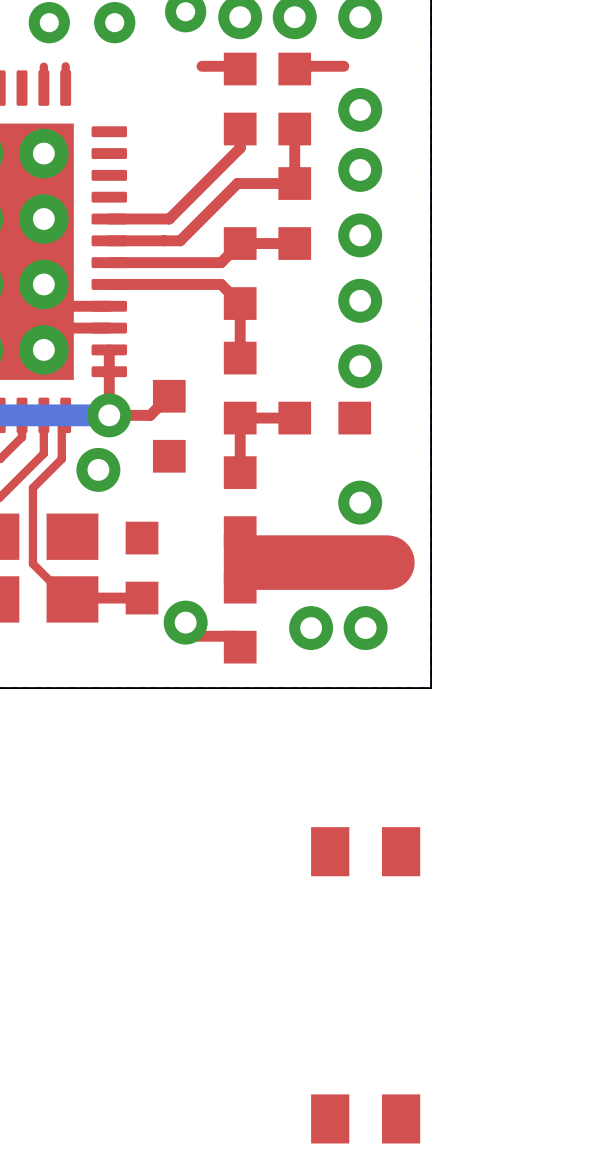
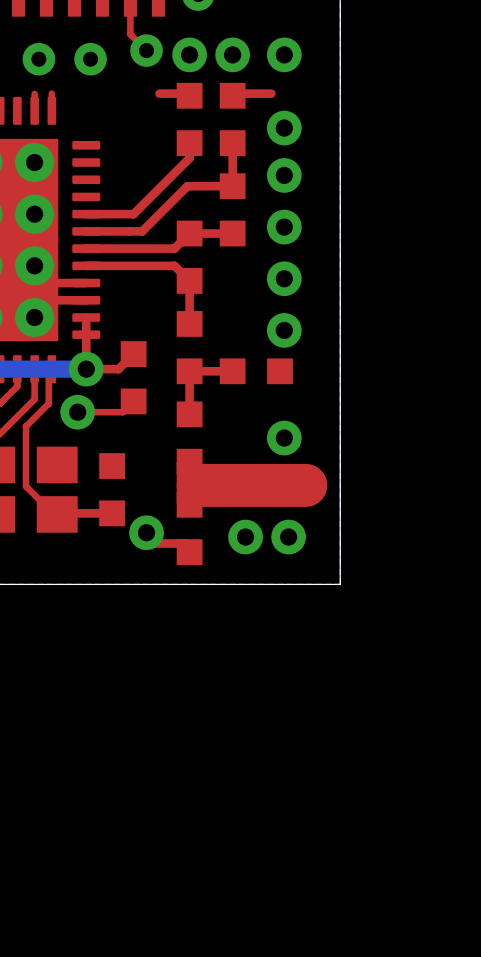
top track: none -> (133, 401) (122, 412) (77, 412)
part: (365, 851) -> none
part: (365, 1118) -> none

